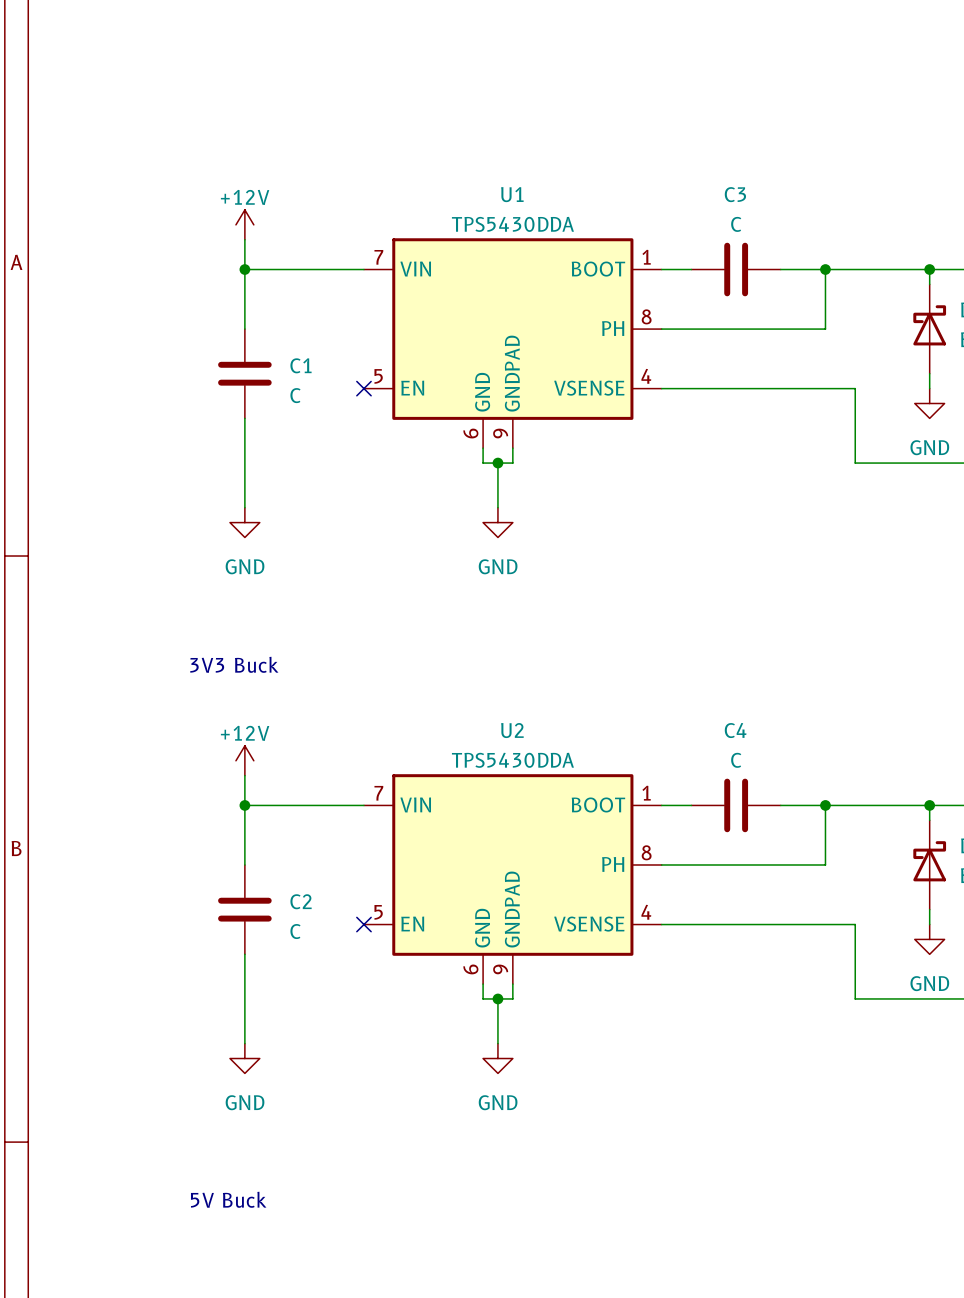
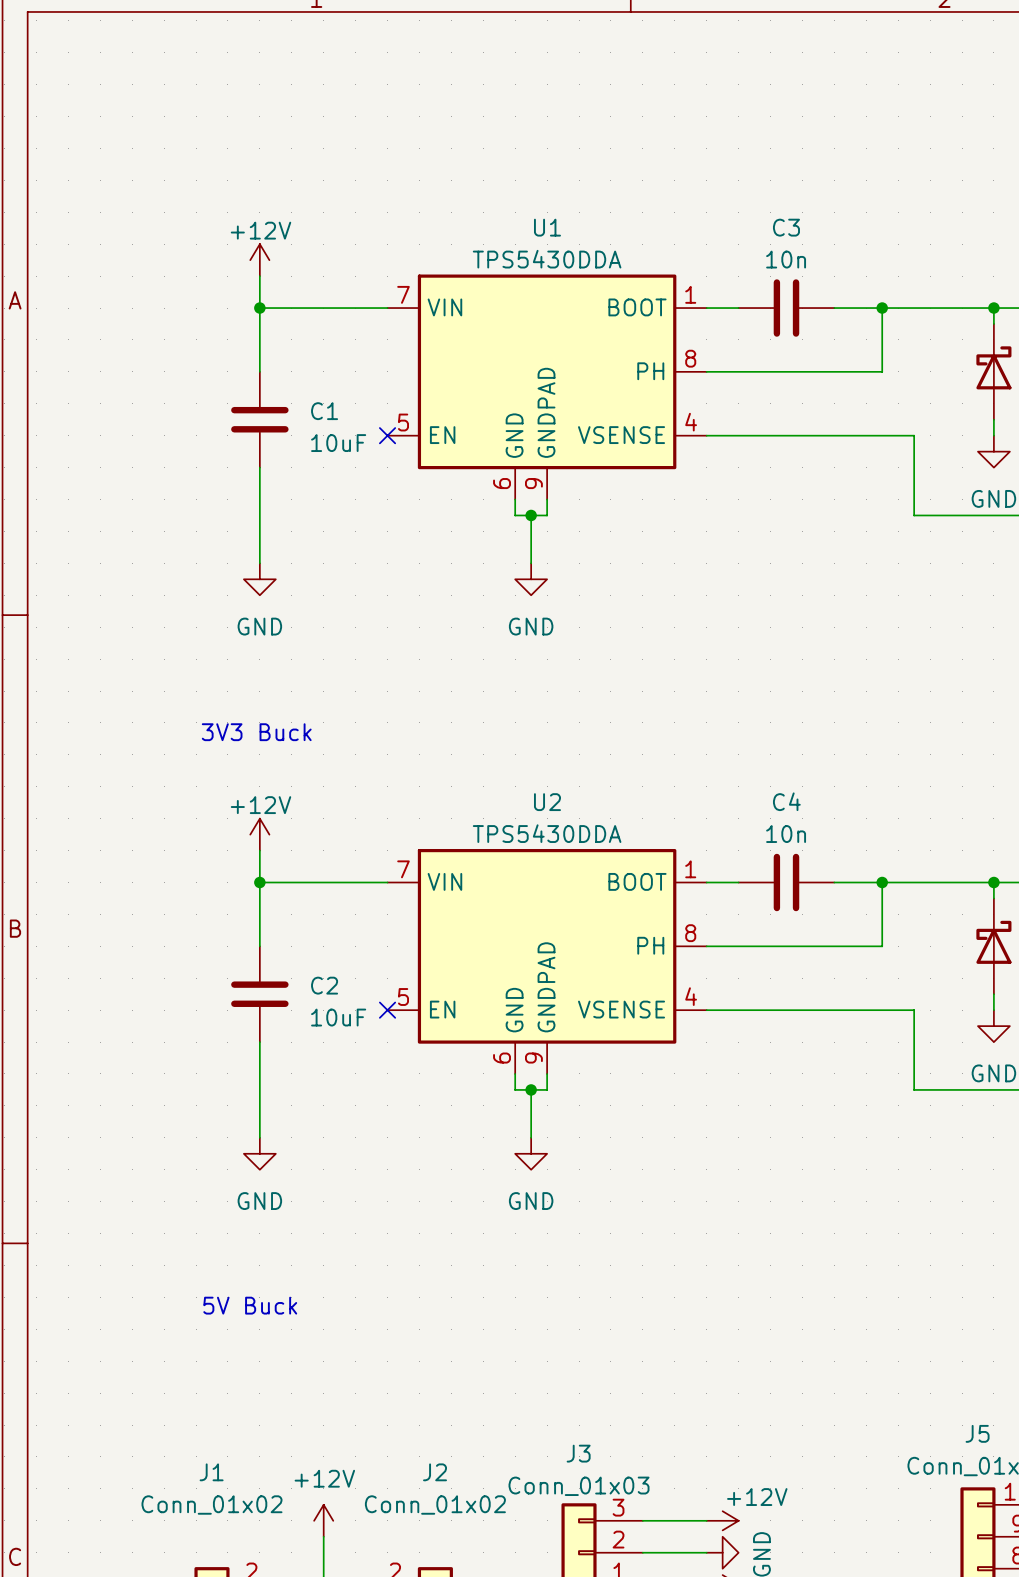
C3 value: C (736, 224) -> 10n (786, 259)
C1 value: C (295, 395) -> 10uF (338, 443)
C4 value: C (736, 760) -> 10n (786, 834)
C2 value: C (295, 931) -> 10uF (338, 1017)

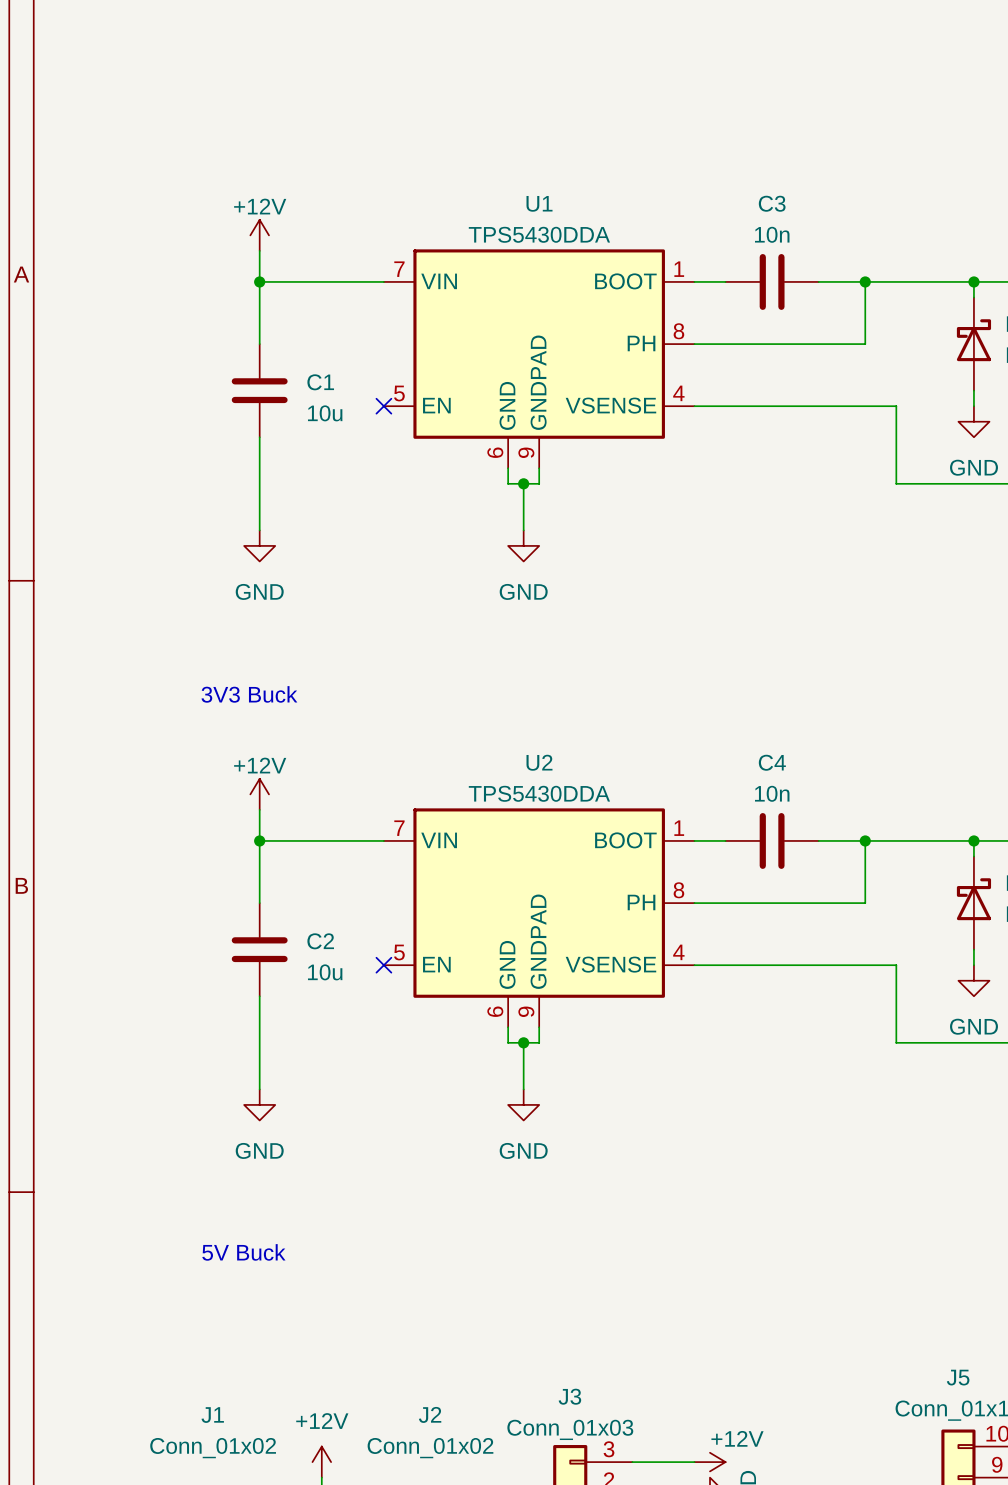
C1 value: 10uF (338, 443) -> 10u (325, 413)
C2 value: 10uF (338, 1017) -> 10u (325, 972)

